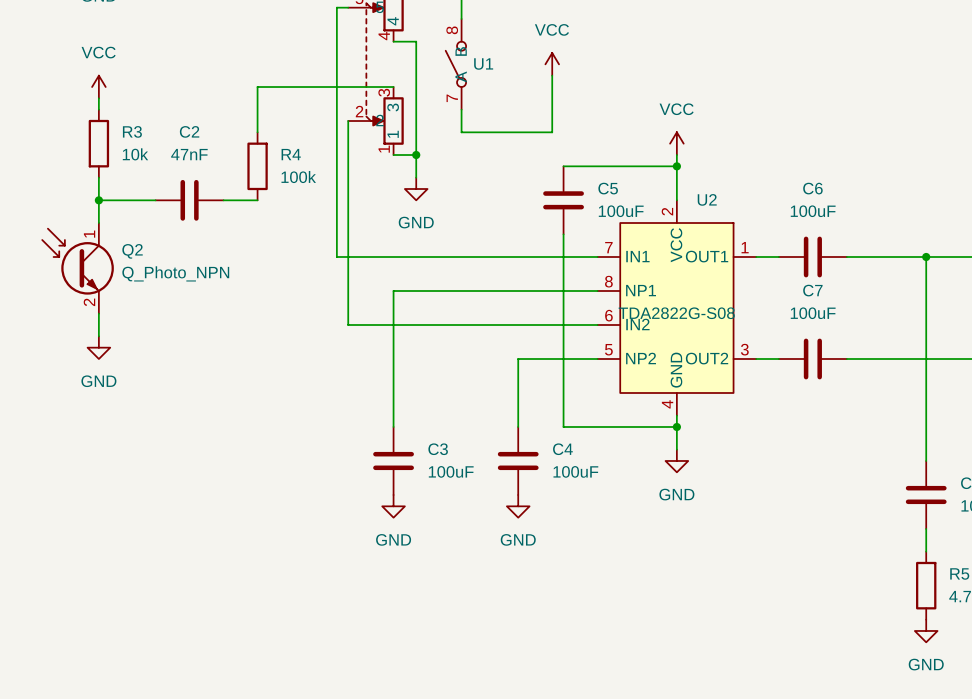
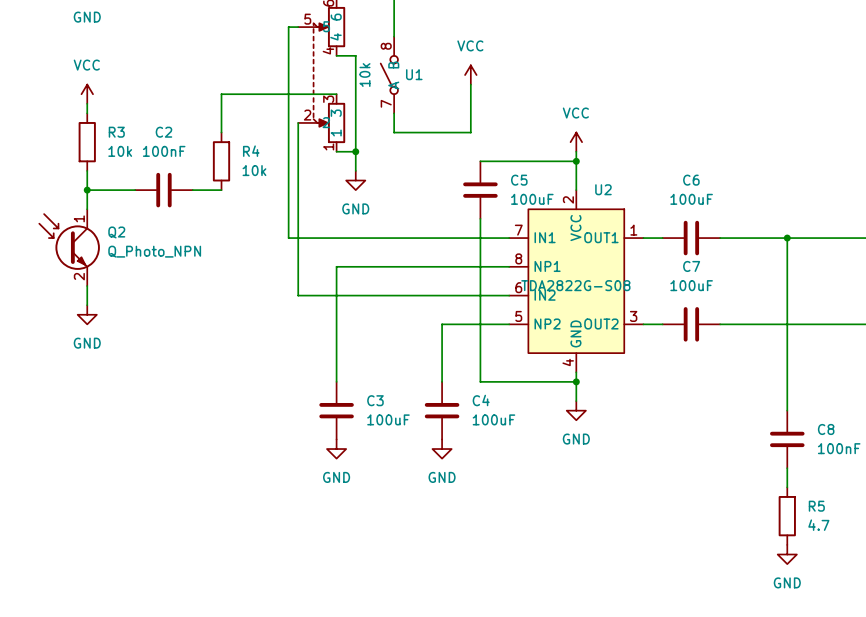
U1 value: none -> 10k (364, 75)
C2 value: 47nF (189, 154) -> 100nF (164, 151)
R4 value: 100k (298, 177) -> 10k (254, 170)

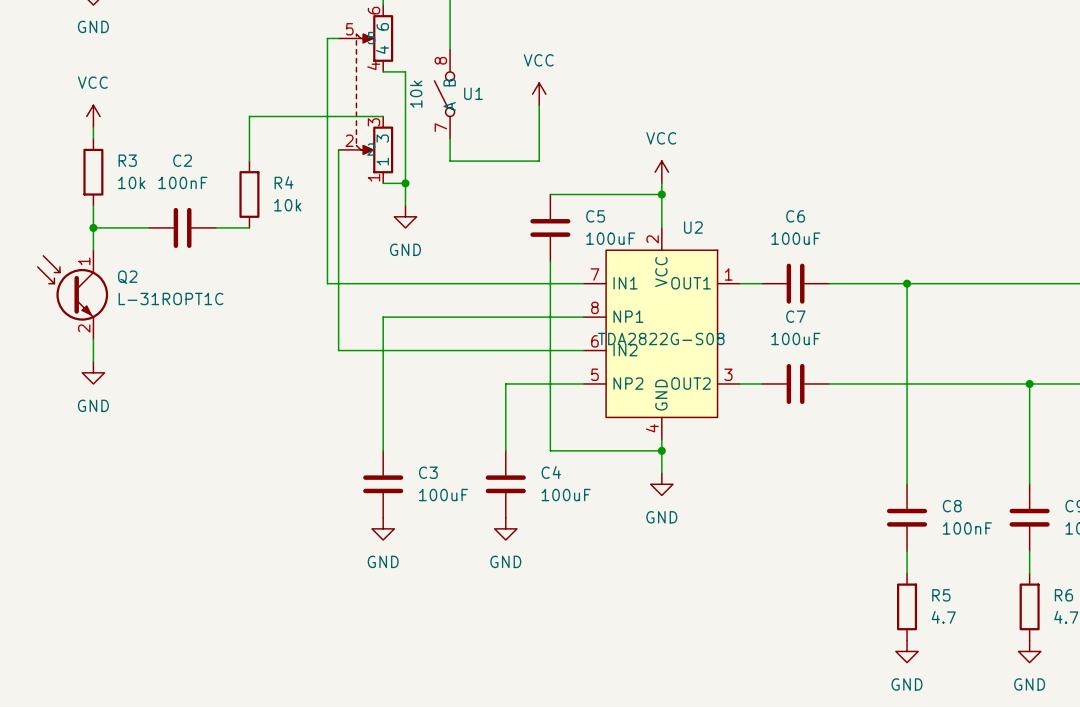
Q2 value: Q_Photo_NPN (154, 251) -> L-31ROPT1C (170, 298)

